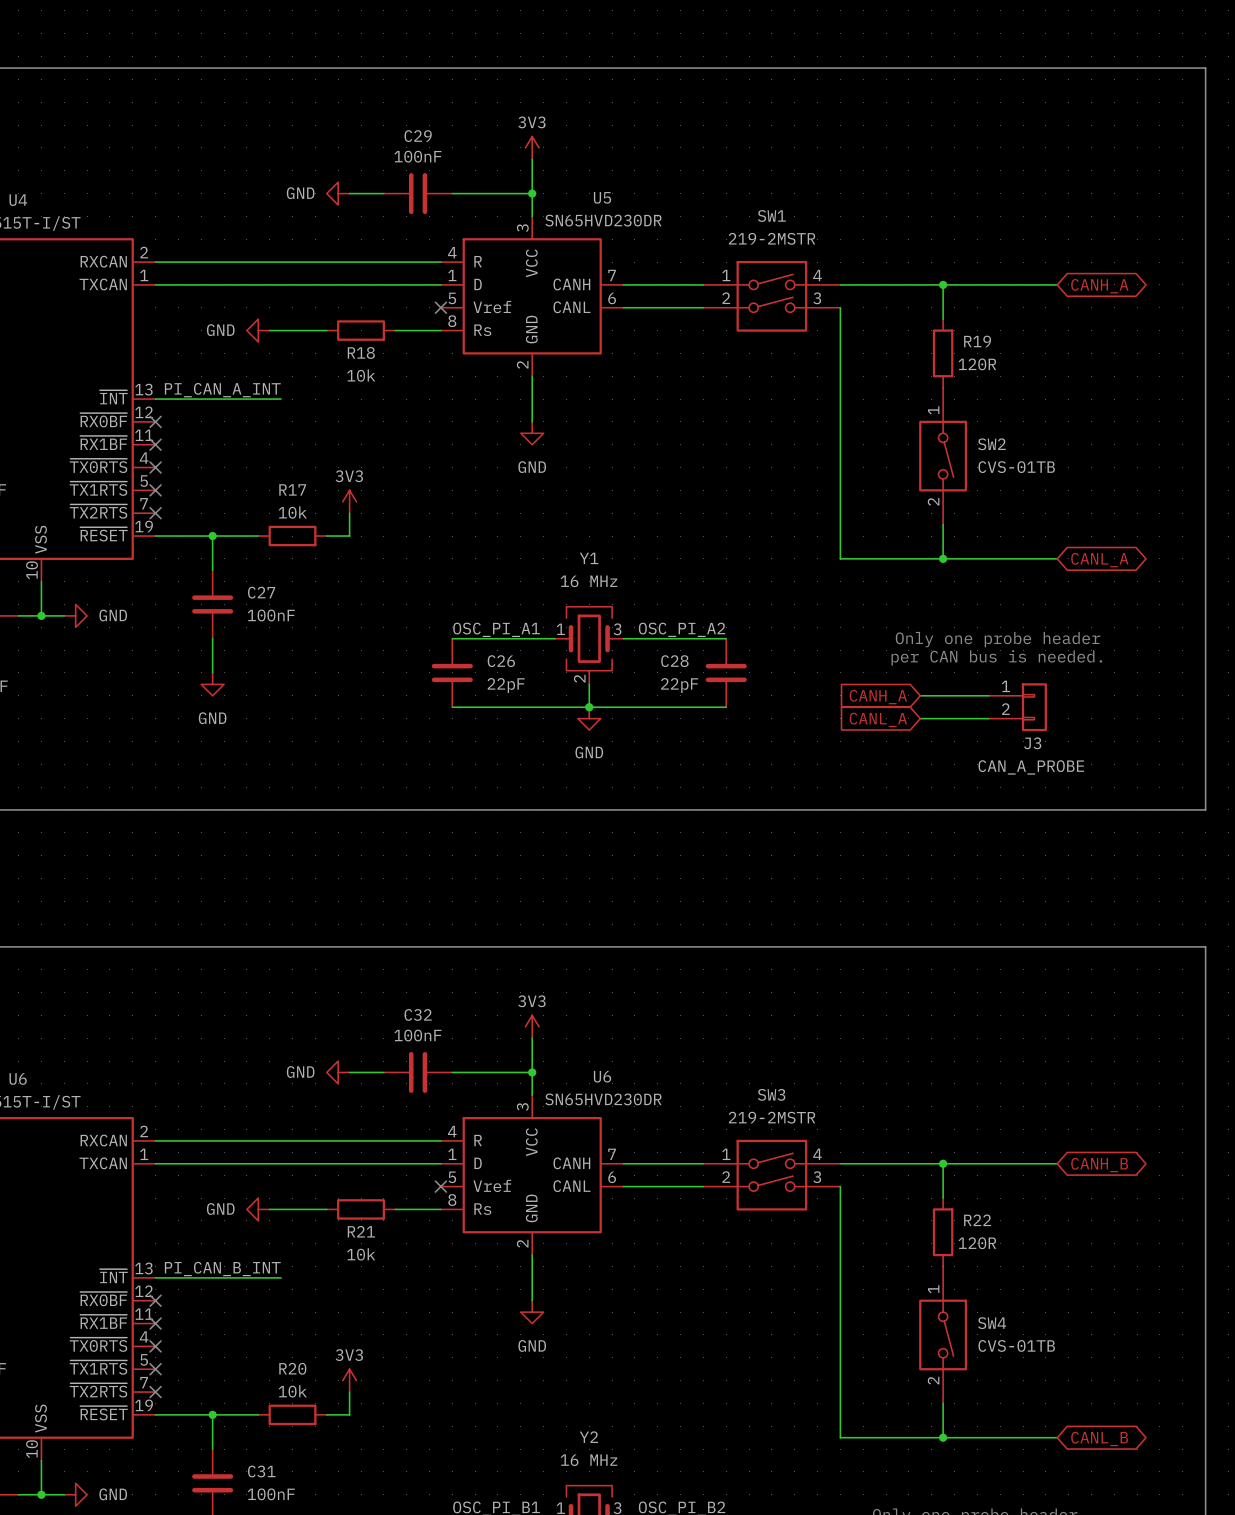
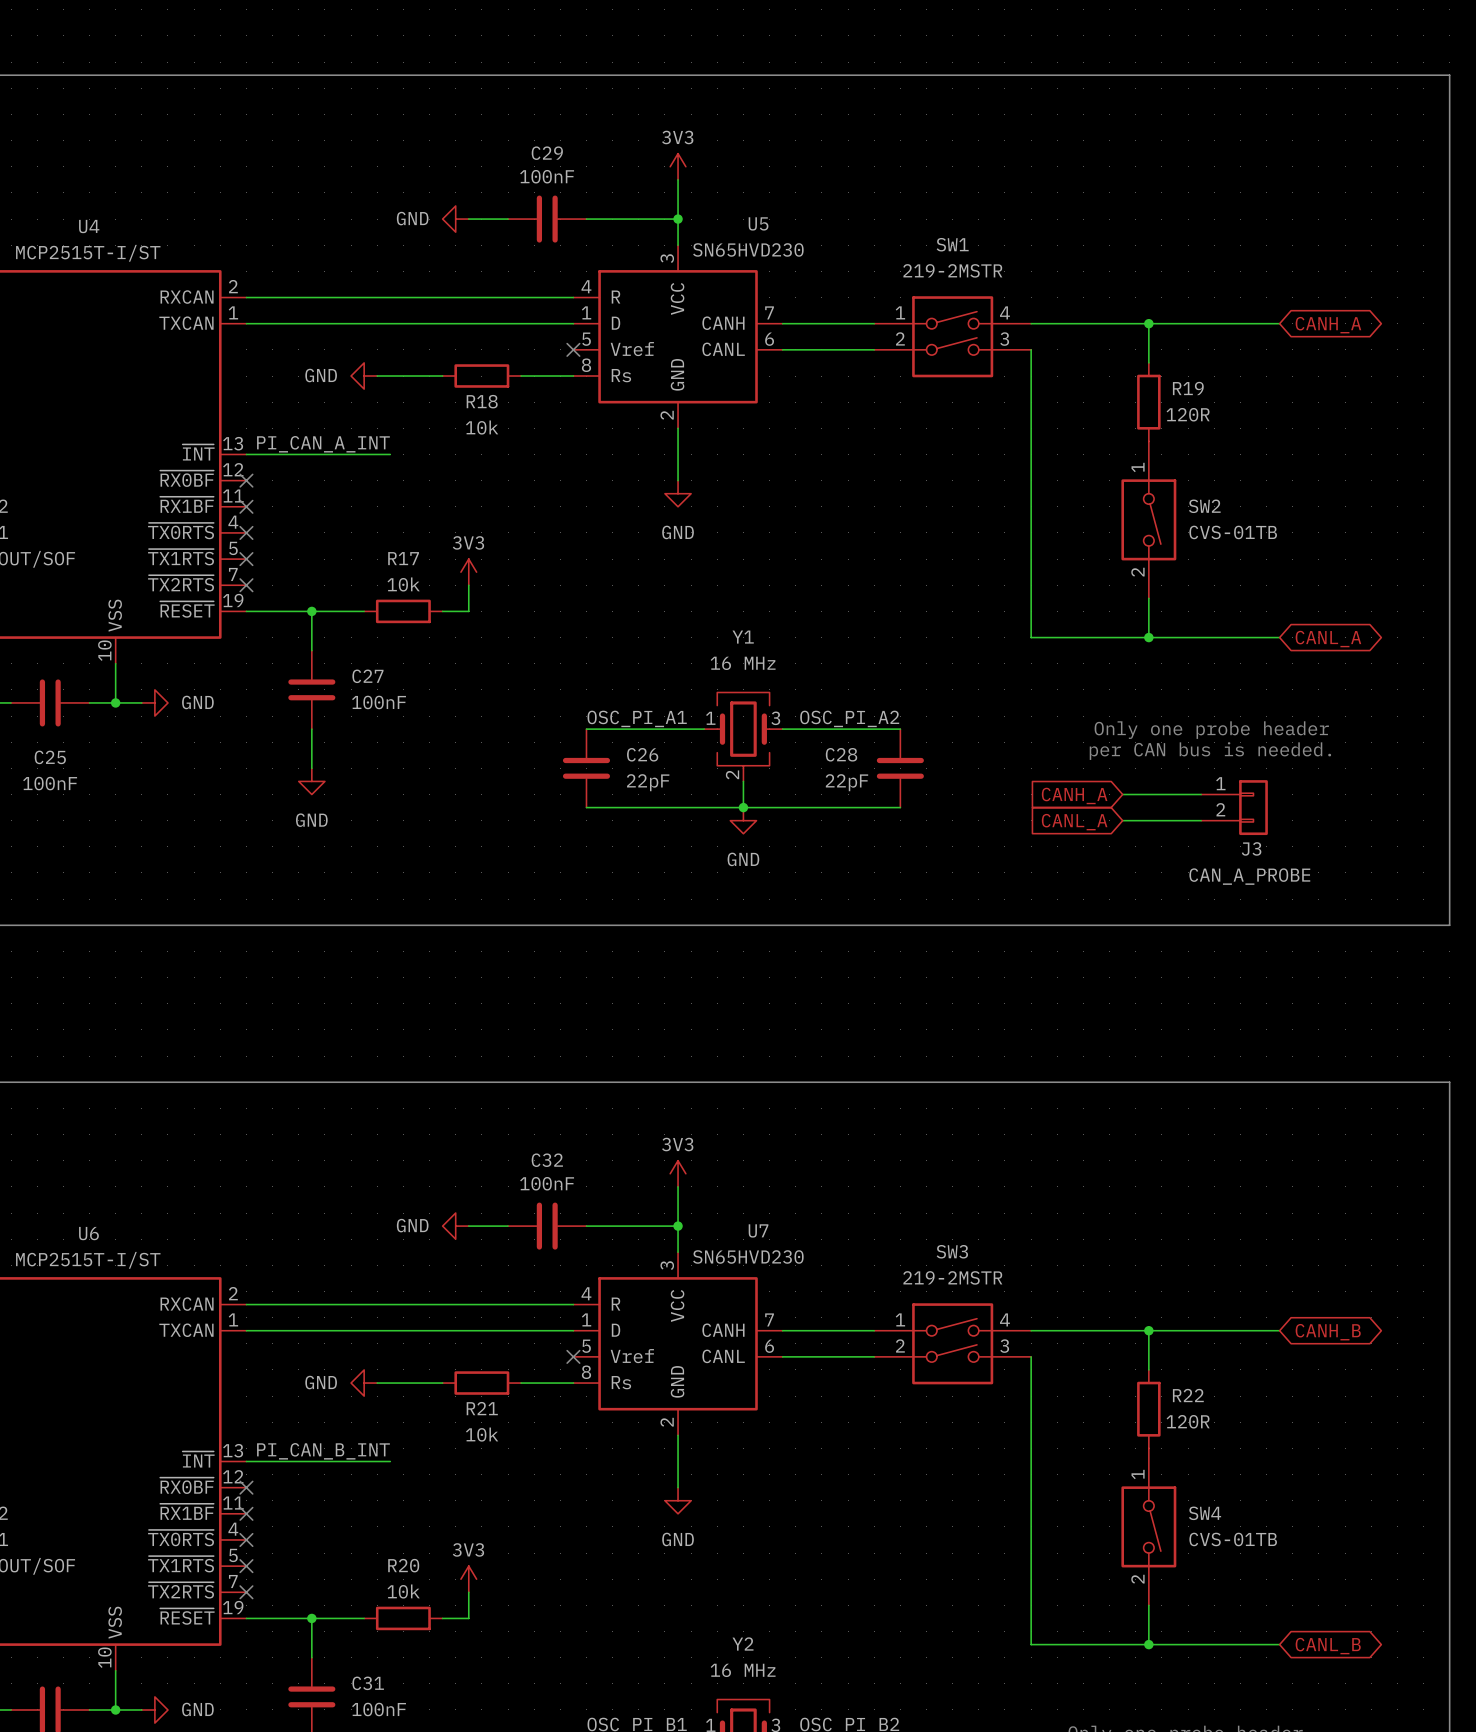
U5 value: SN65HVD230DR (603, 220) -> SN65HVD230 (748, 249)
U6 name: U6 (602, 1076) -> U7 (758, 1230)
U6 value: SN65HVD230DR (603, 1099) -> SN65HVD230 (748, 1256)

